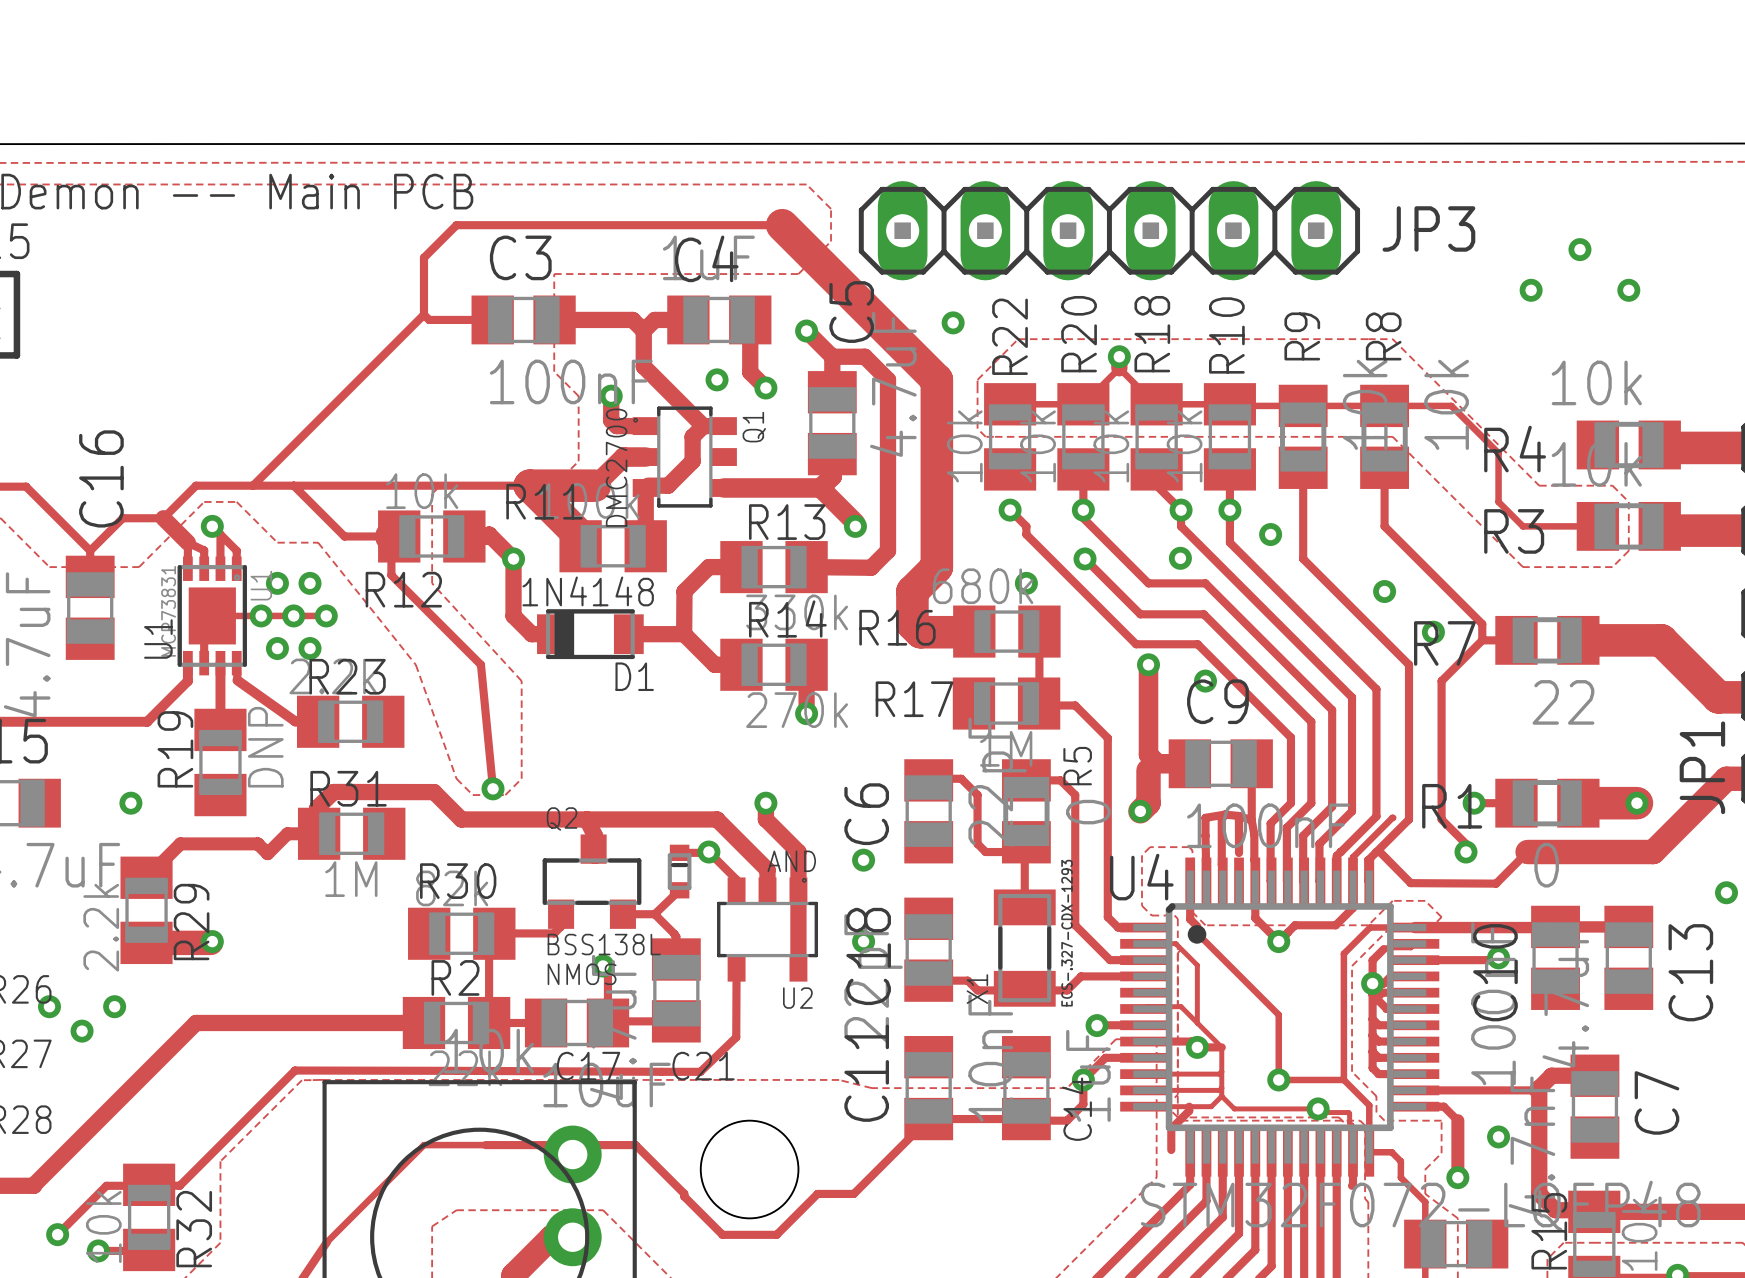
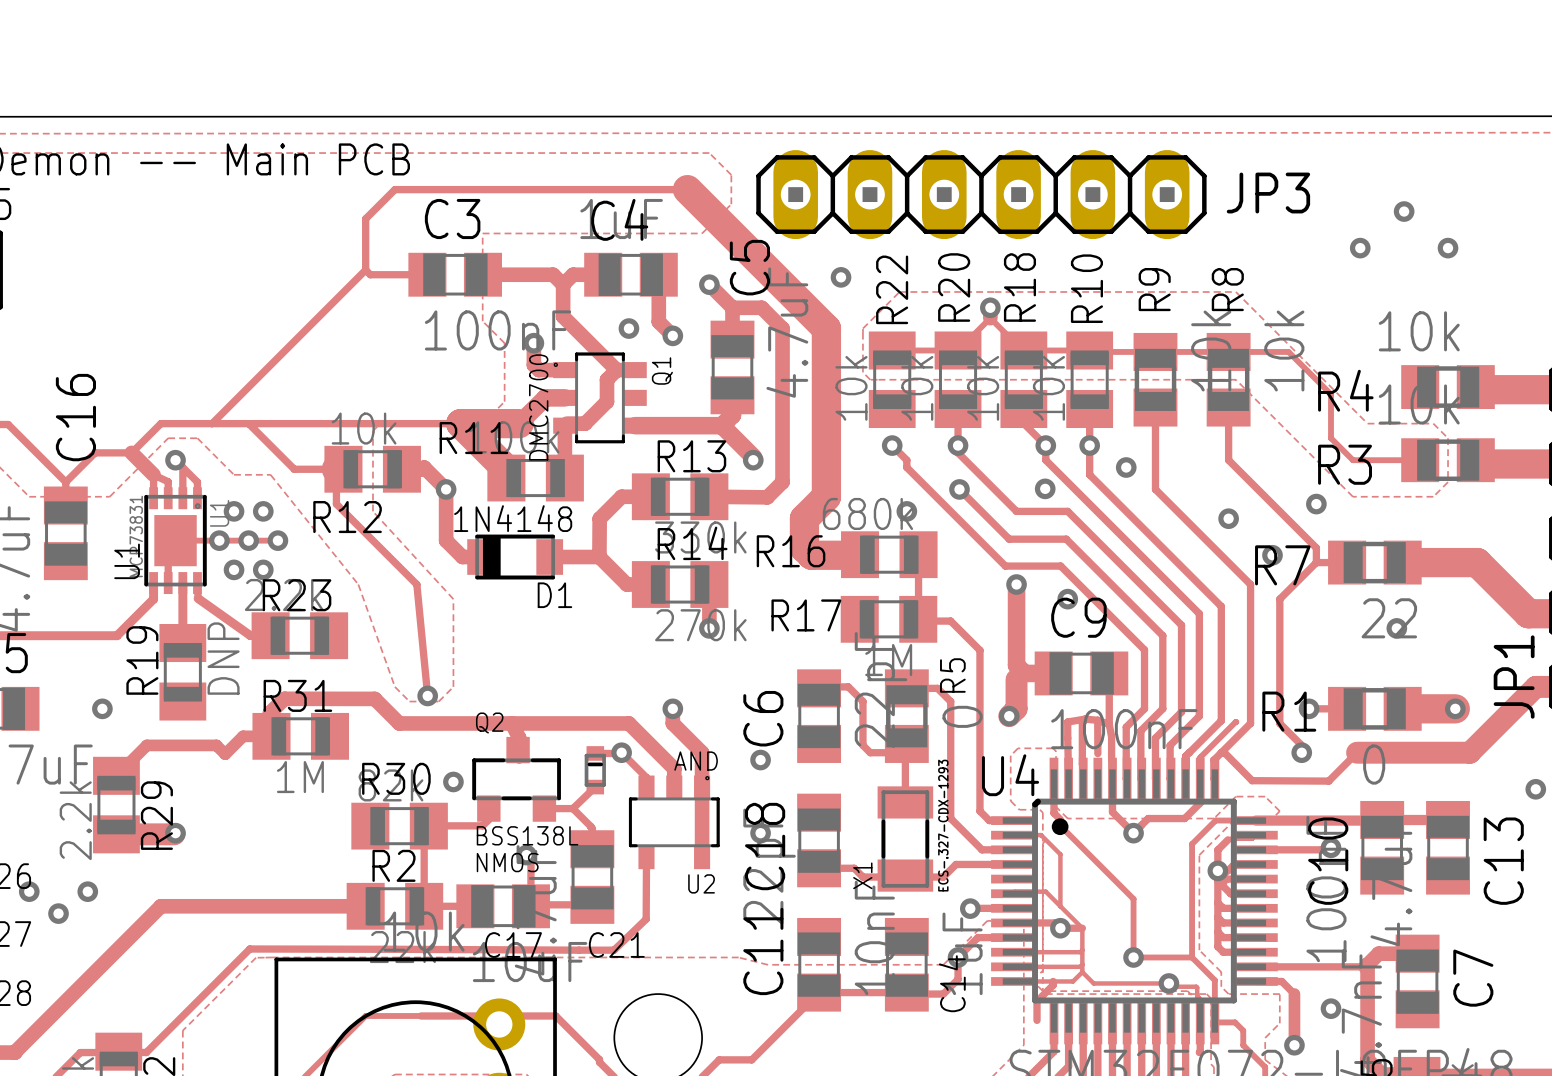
via: none -> (1316, 504)
via: none -> (1396, 628)
via: none -> (453, 781)

